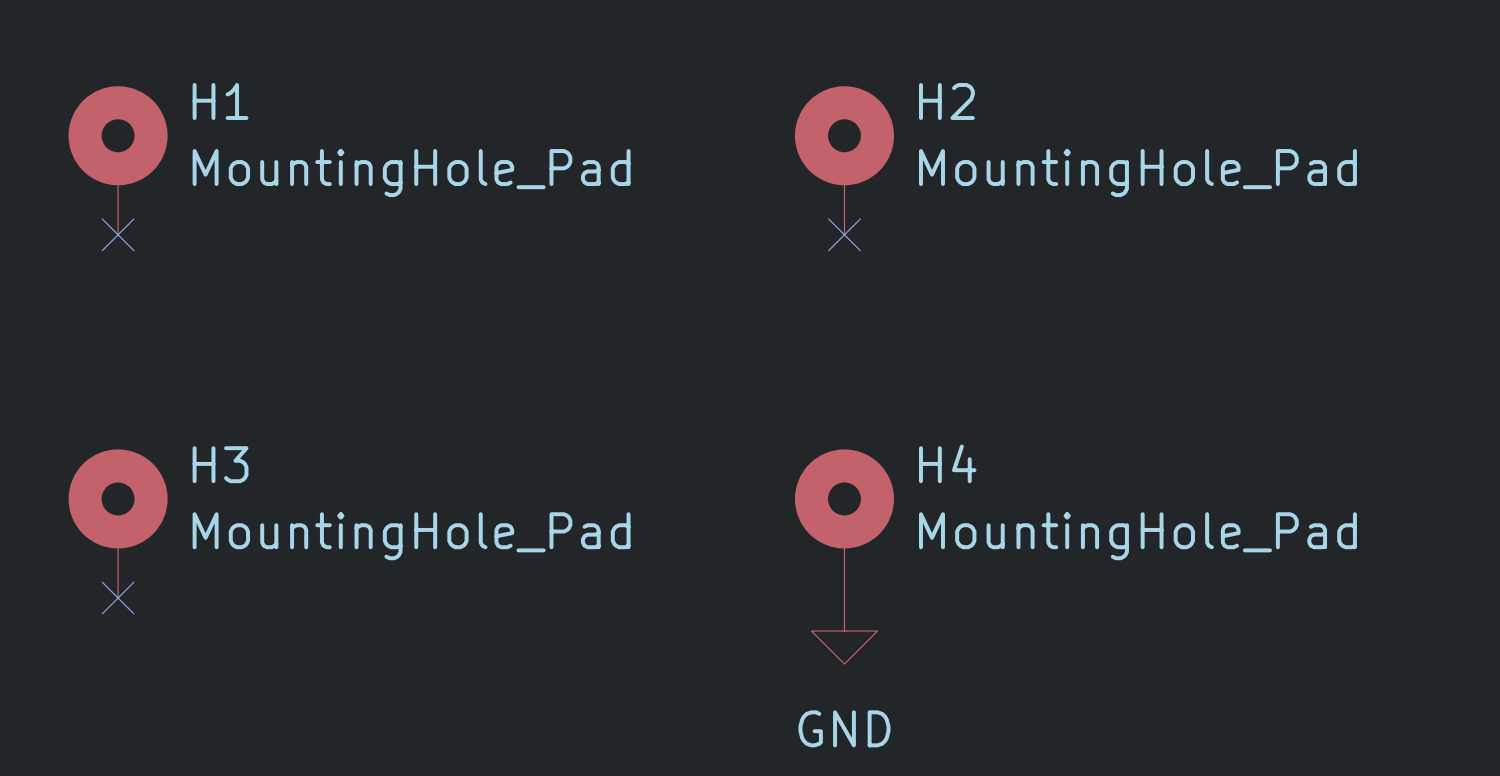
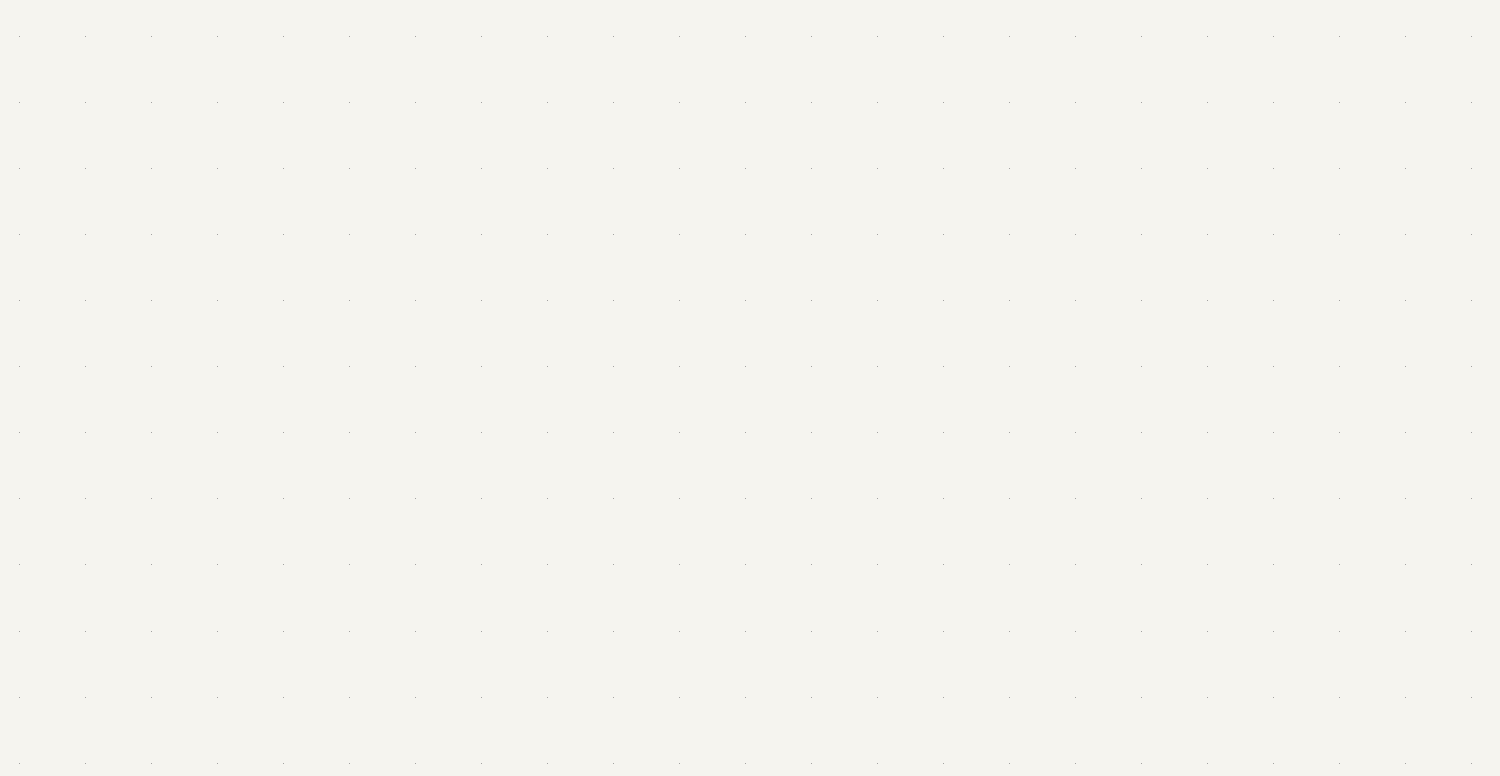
H1: MountingHole_Pad (118, 160) -> none
H2: MountingHole_Pad (844, 160) -> none
no-connect mark: (118, 234) -> none
no-connect mark: (844, 234) -> none
H3: MountingHole_Pad (118, 523) -> none
H4: MountingHole_Pad (844, 523) -> none
no-connect mark: (118, 598) -> none
power symbol: GND (844, 631) -> none

